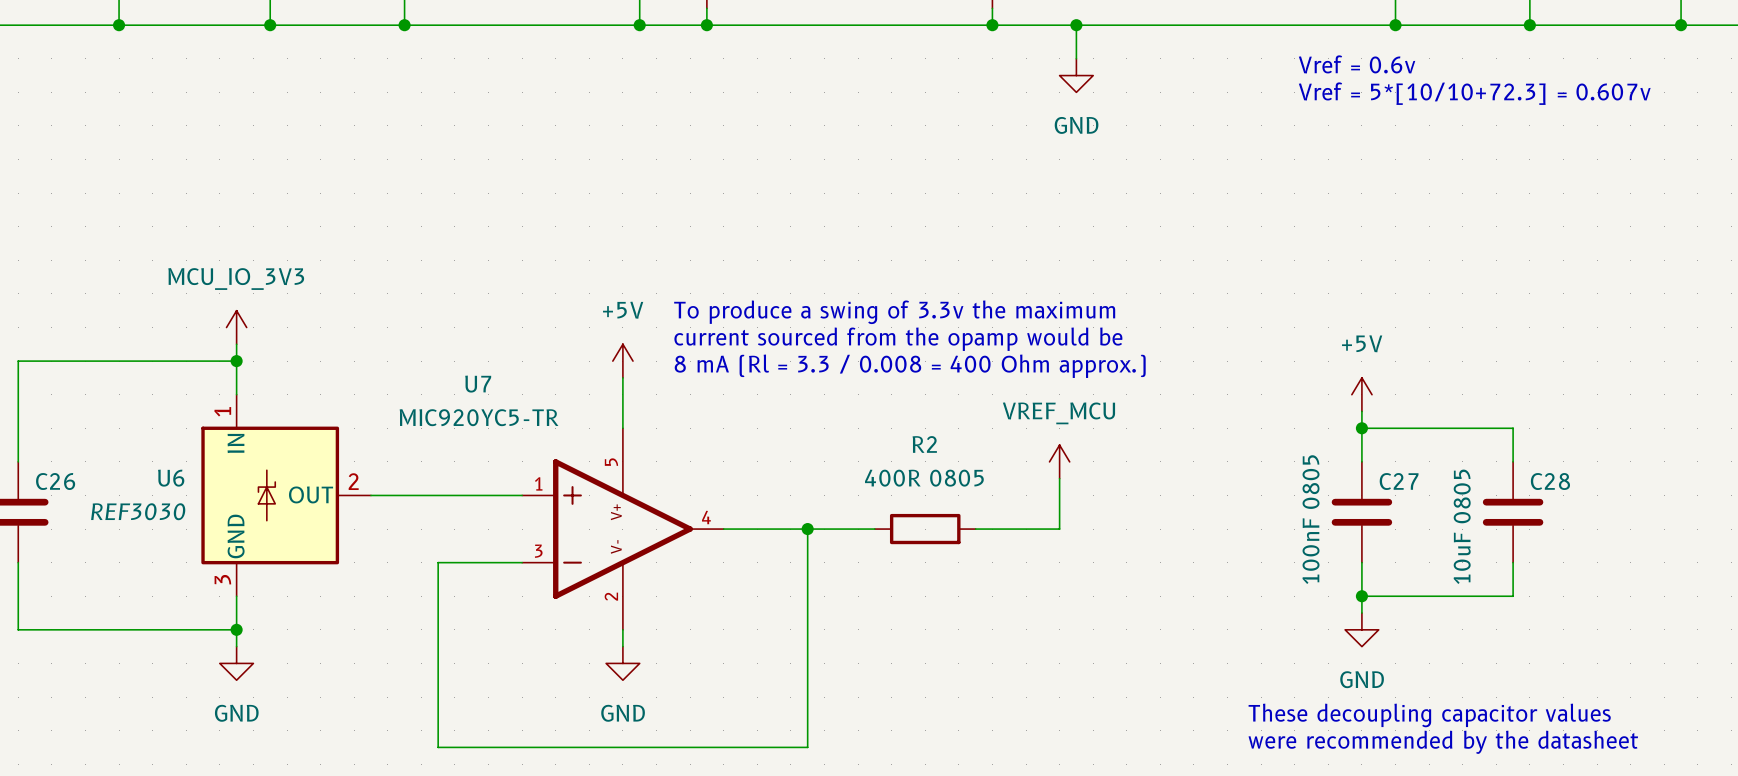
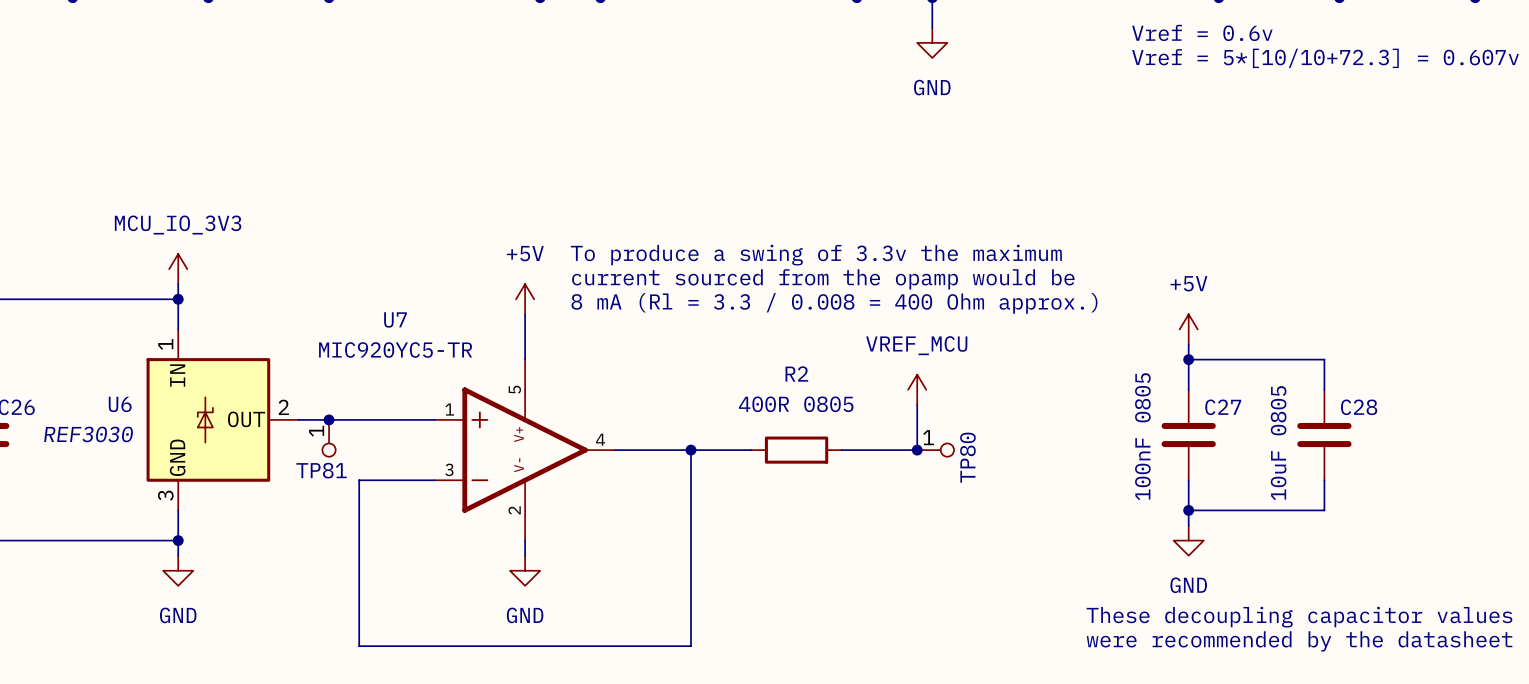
junction: none -> (329, 419)
TP81: none -> (329, 438)
junction: none -> (917, 450)
TP80: none -> (935, 450)

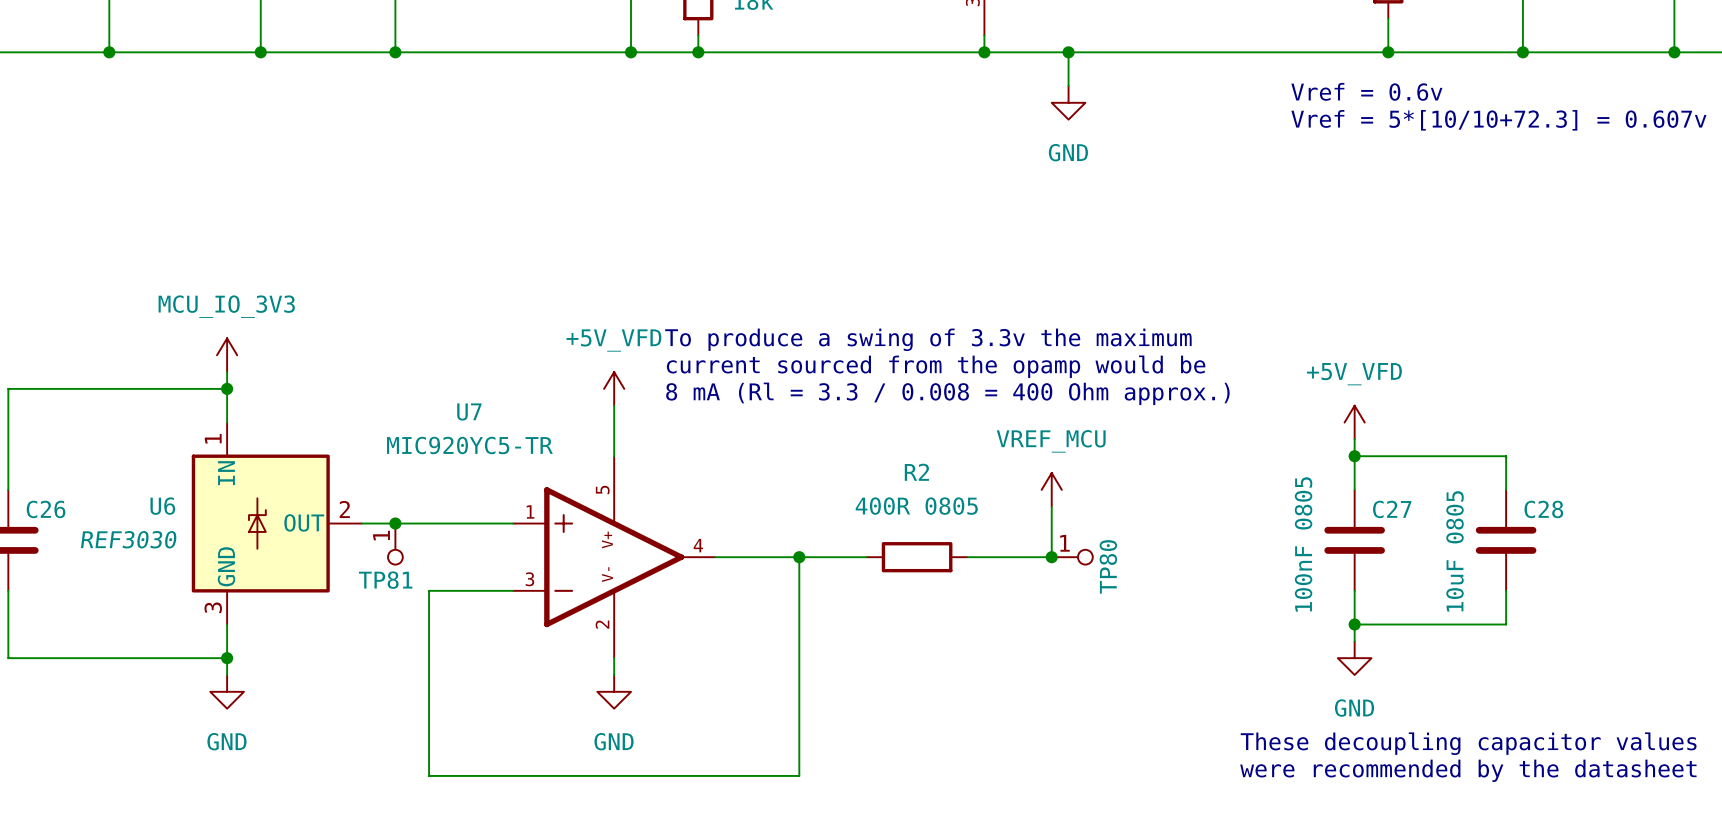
power symbol: +5V (525, 299) -> +5V_VFD (614, 388)
power symbol: +5V (1188, 329) -> +5V_VFD (1354, 422)

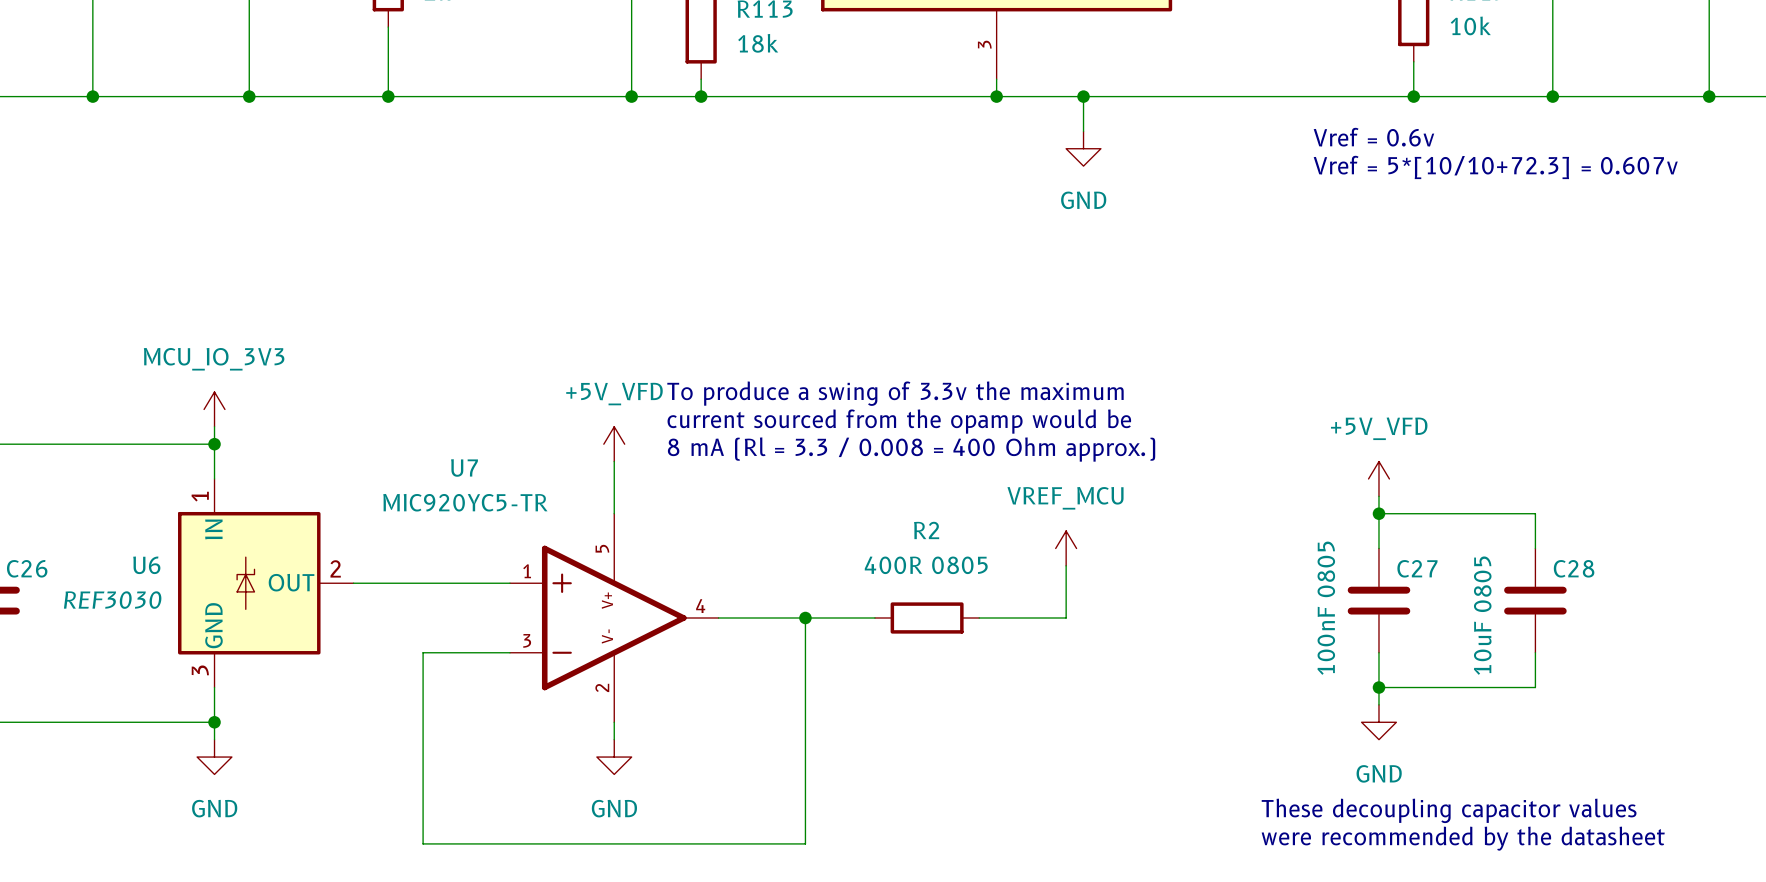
junction: (395, 523) -> none
TP81: (395, 544) -> none
junction: (1051, 557) -> none
TP80: (1072, 557) -> none

